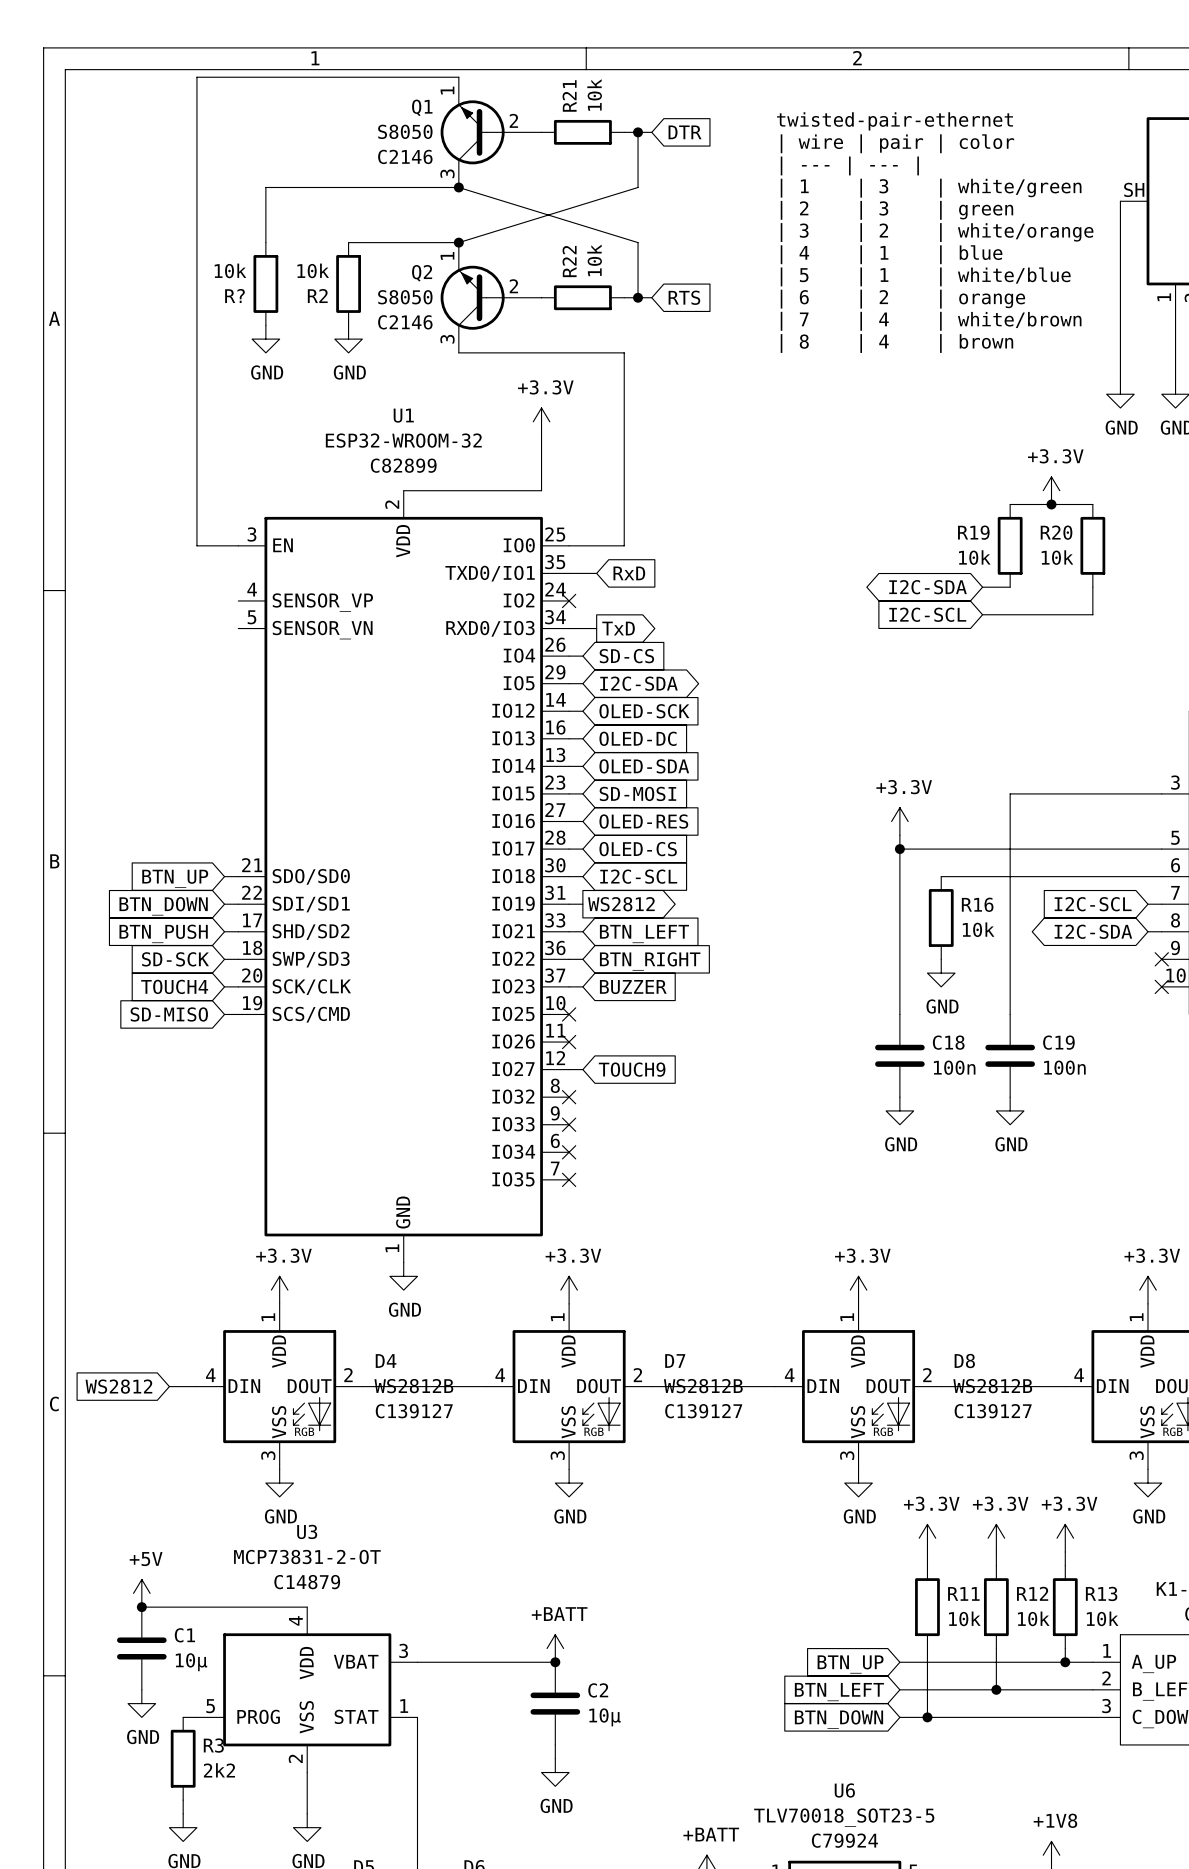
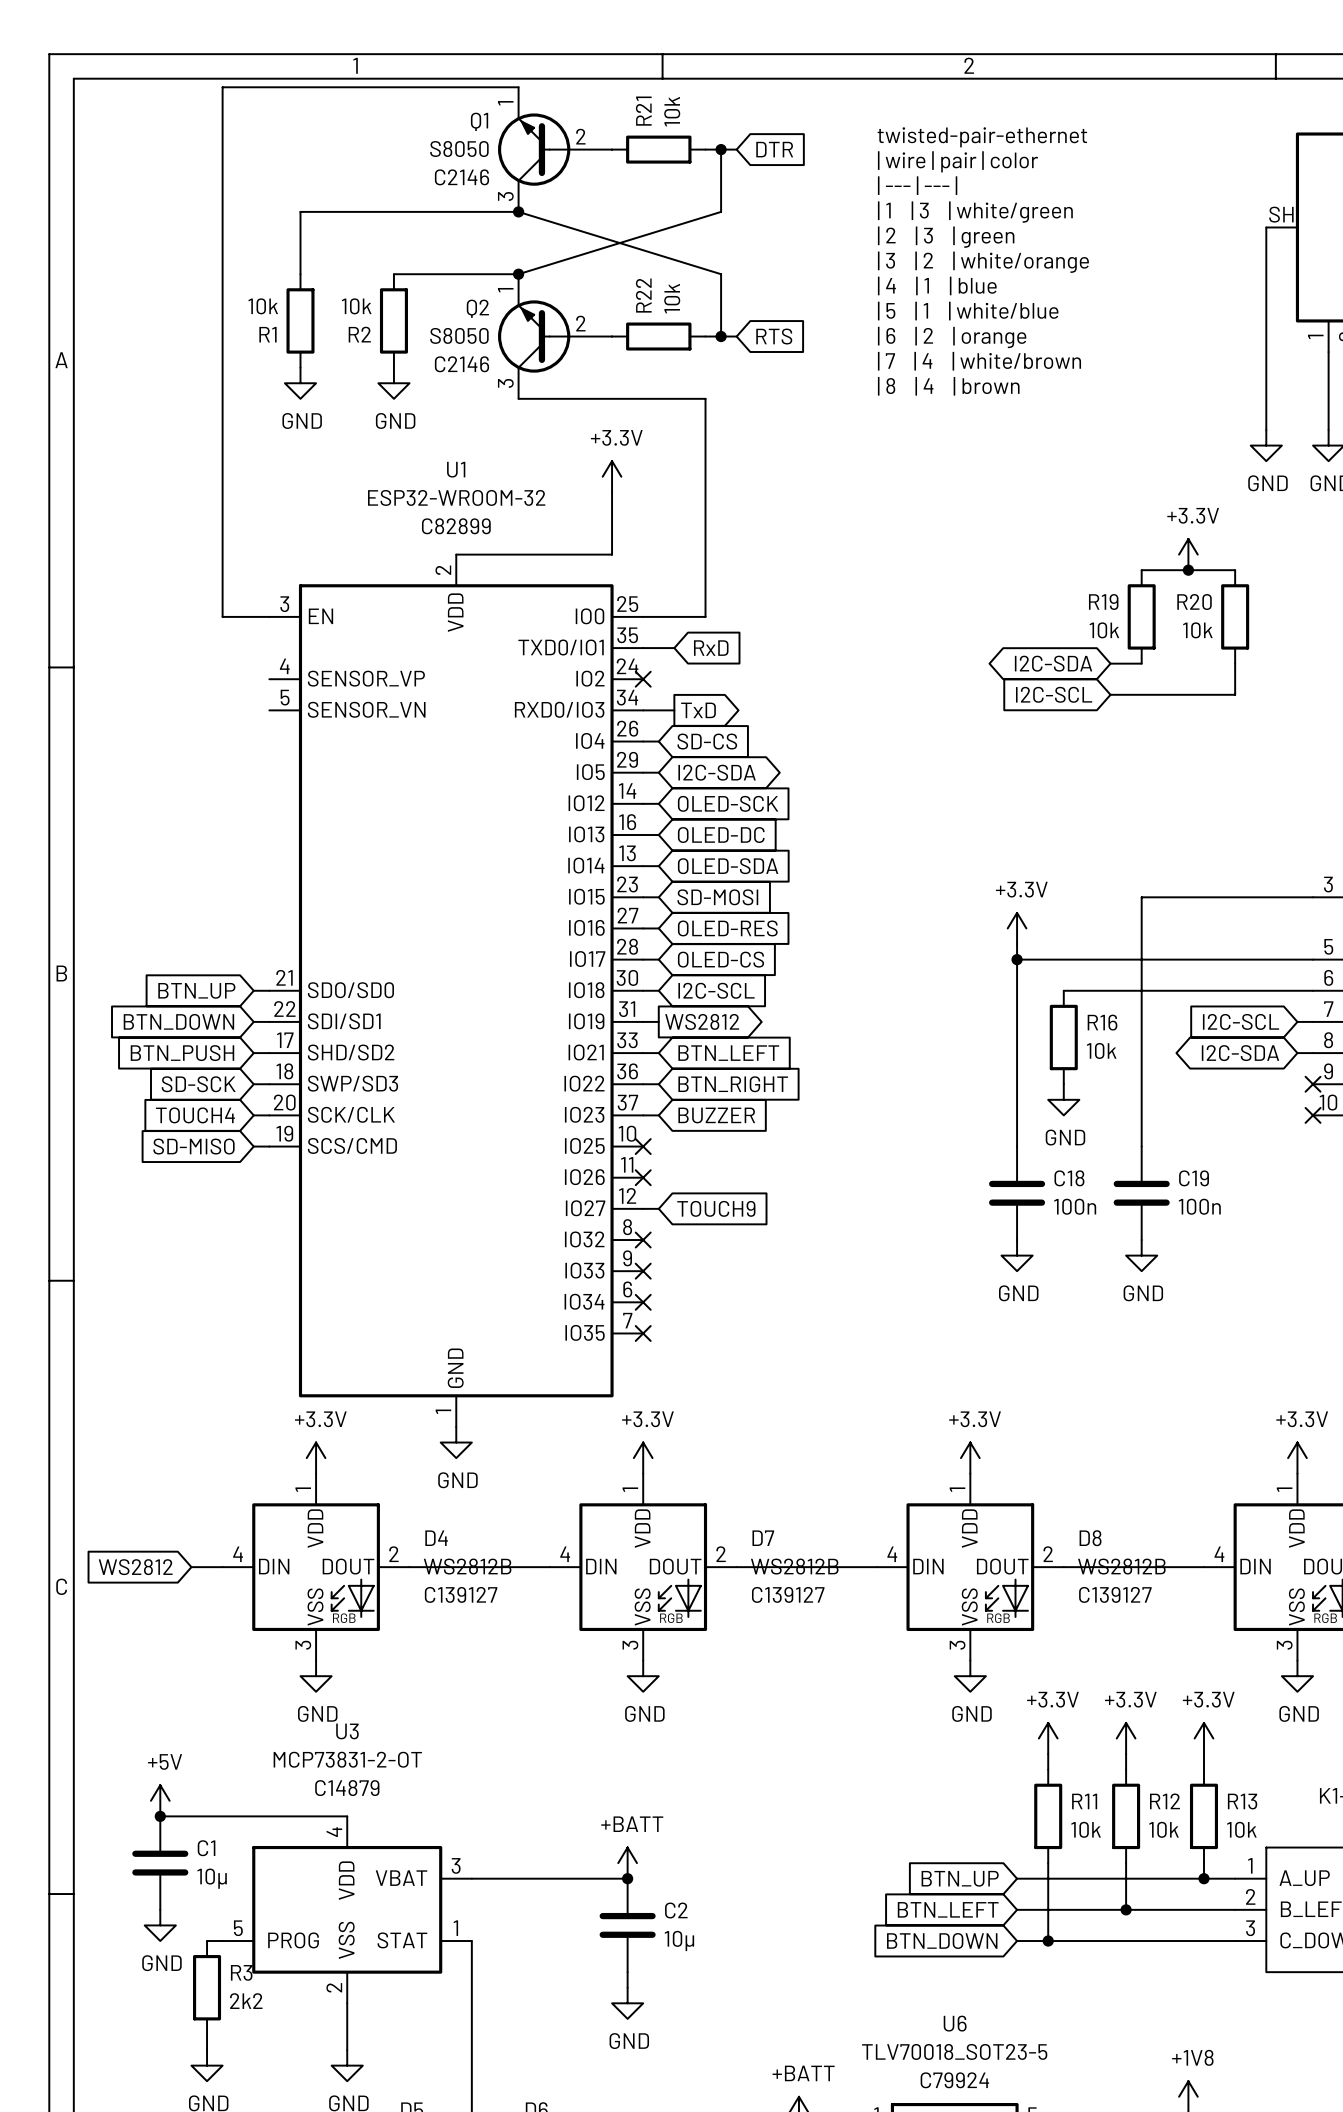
R? name: R? (234, 296) -> R1 (268, 334)

